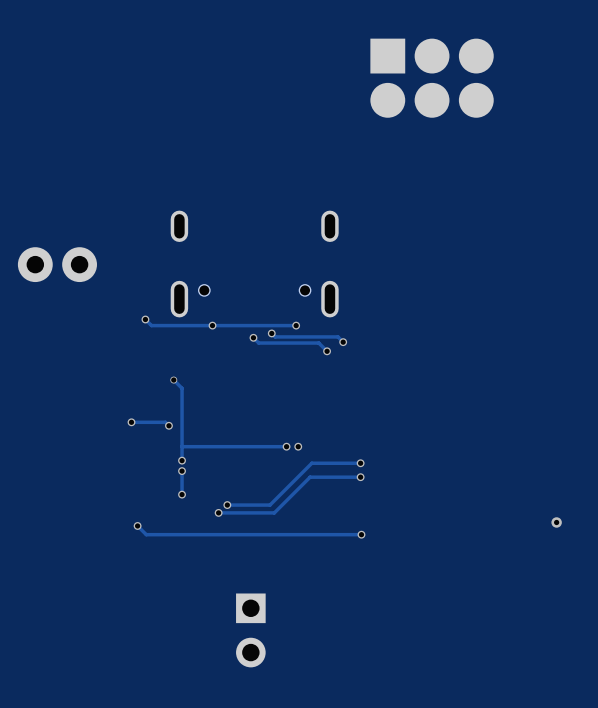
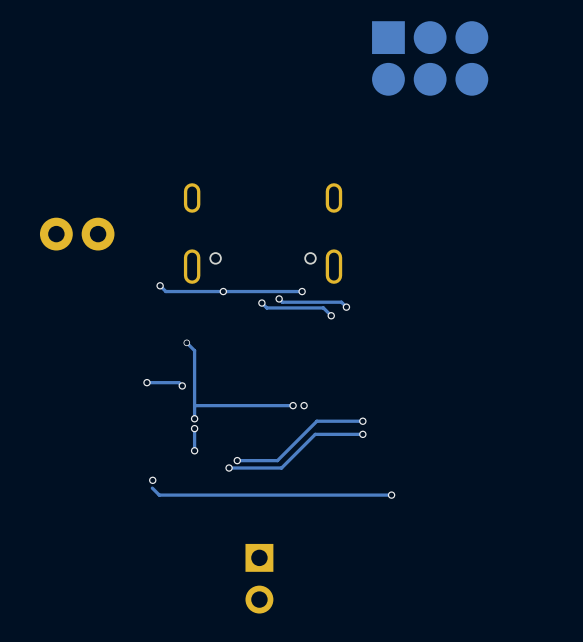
via: (556, 522) -> none
track: (137, 525) (146, 534) (361, 534) -> none
track: none -> (152, 488) (159, 495) (391, 495)
via position: (361, 534) -> (391, 495)

